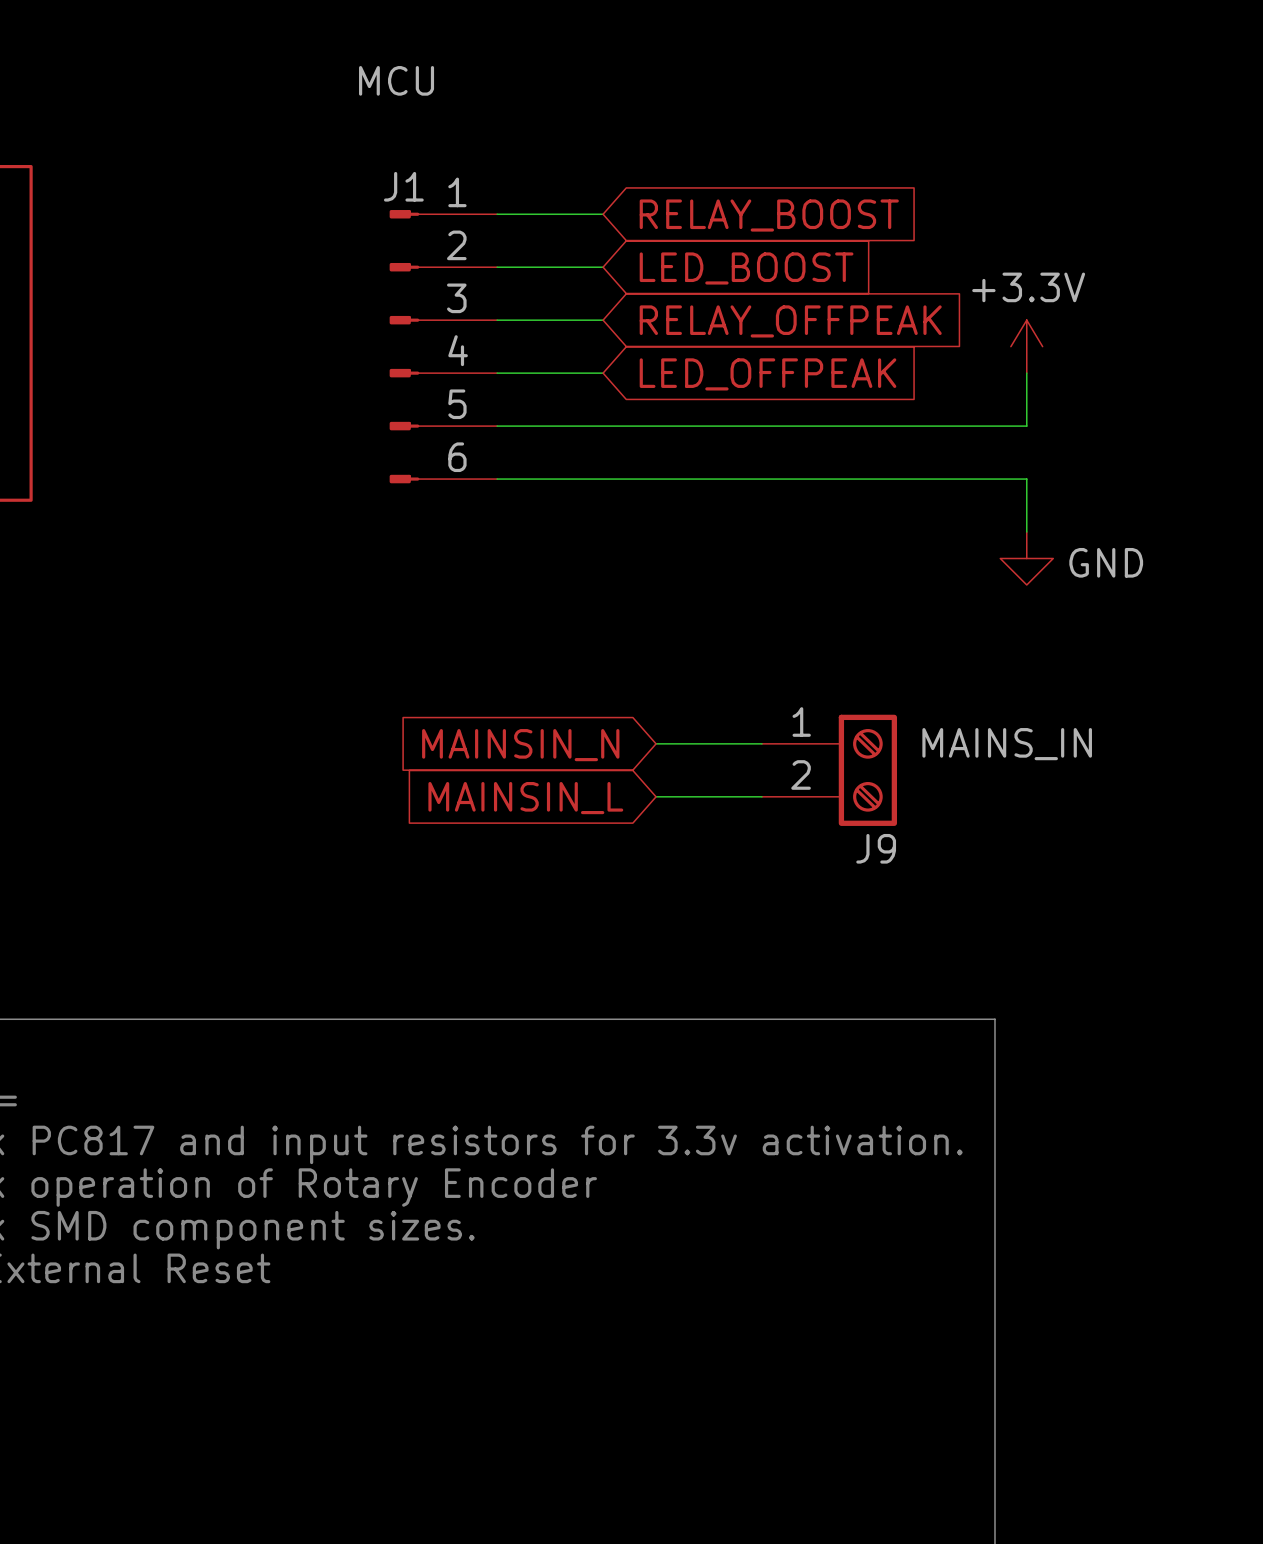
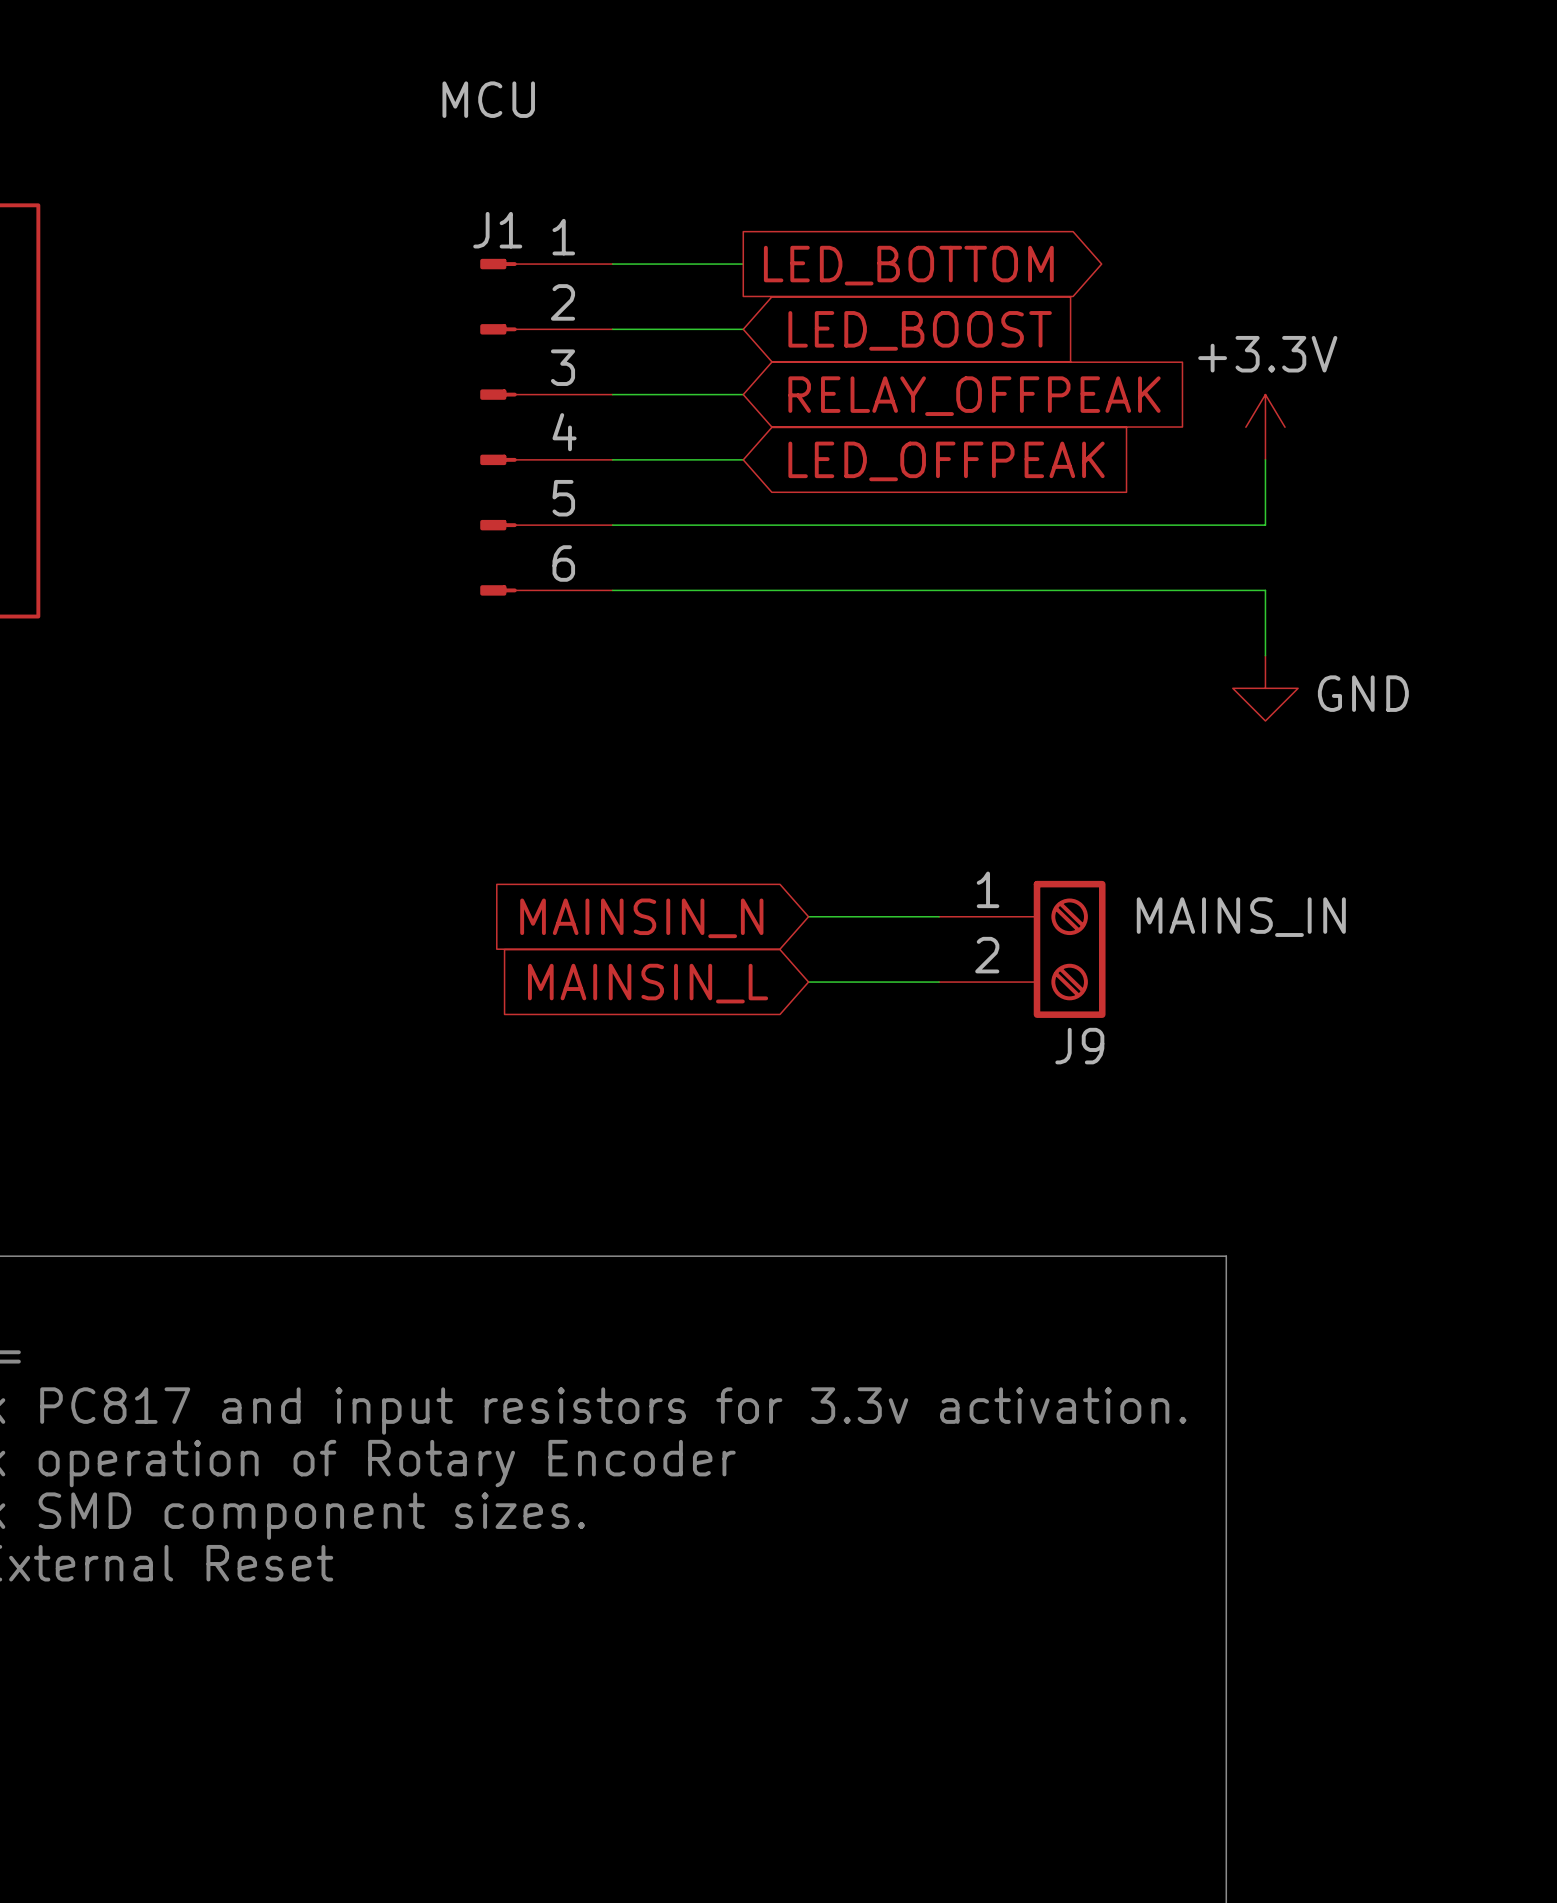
global label shape: input (769, 215) -> output (908, 265)
global label: RELAY_BOOST (769, 215) -> LED_BOTTOM (908, 265)

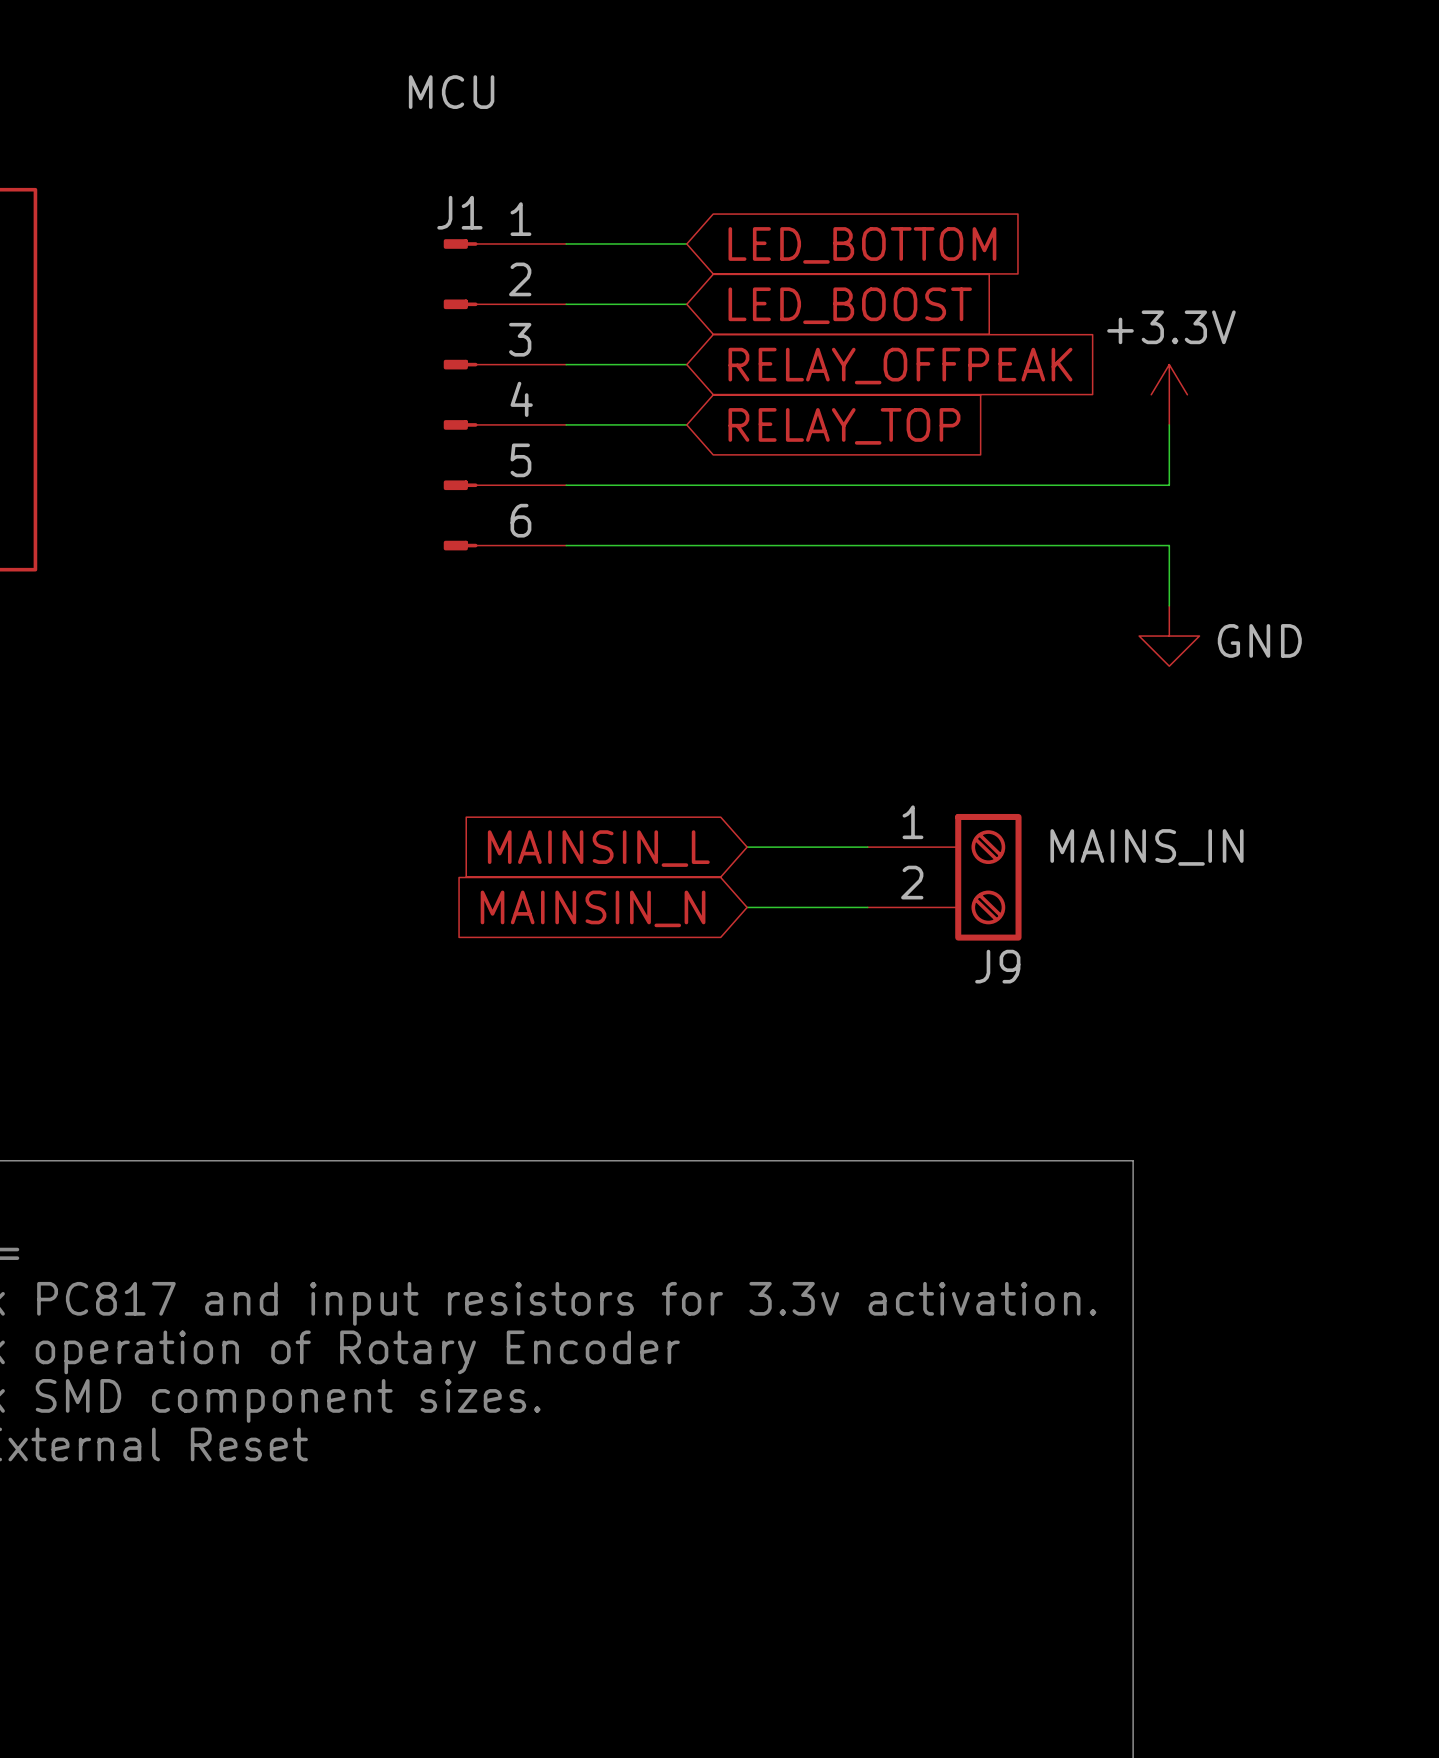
global label shape: output (908, 265) -> input (862, 245)
global label: LED_OFFPEAK (946, 461) -> RELAY_TOP (844, 426)
global label: MAINSIN_N (641, 918) -> MAINSIN_L (598, 848)
global label: MAINSIN_L (648, 983) -> MAINSIN_N (593, 908)

